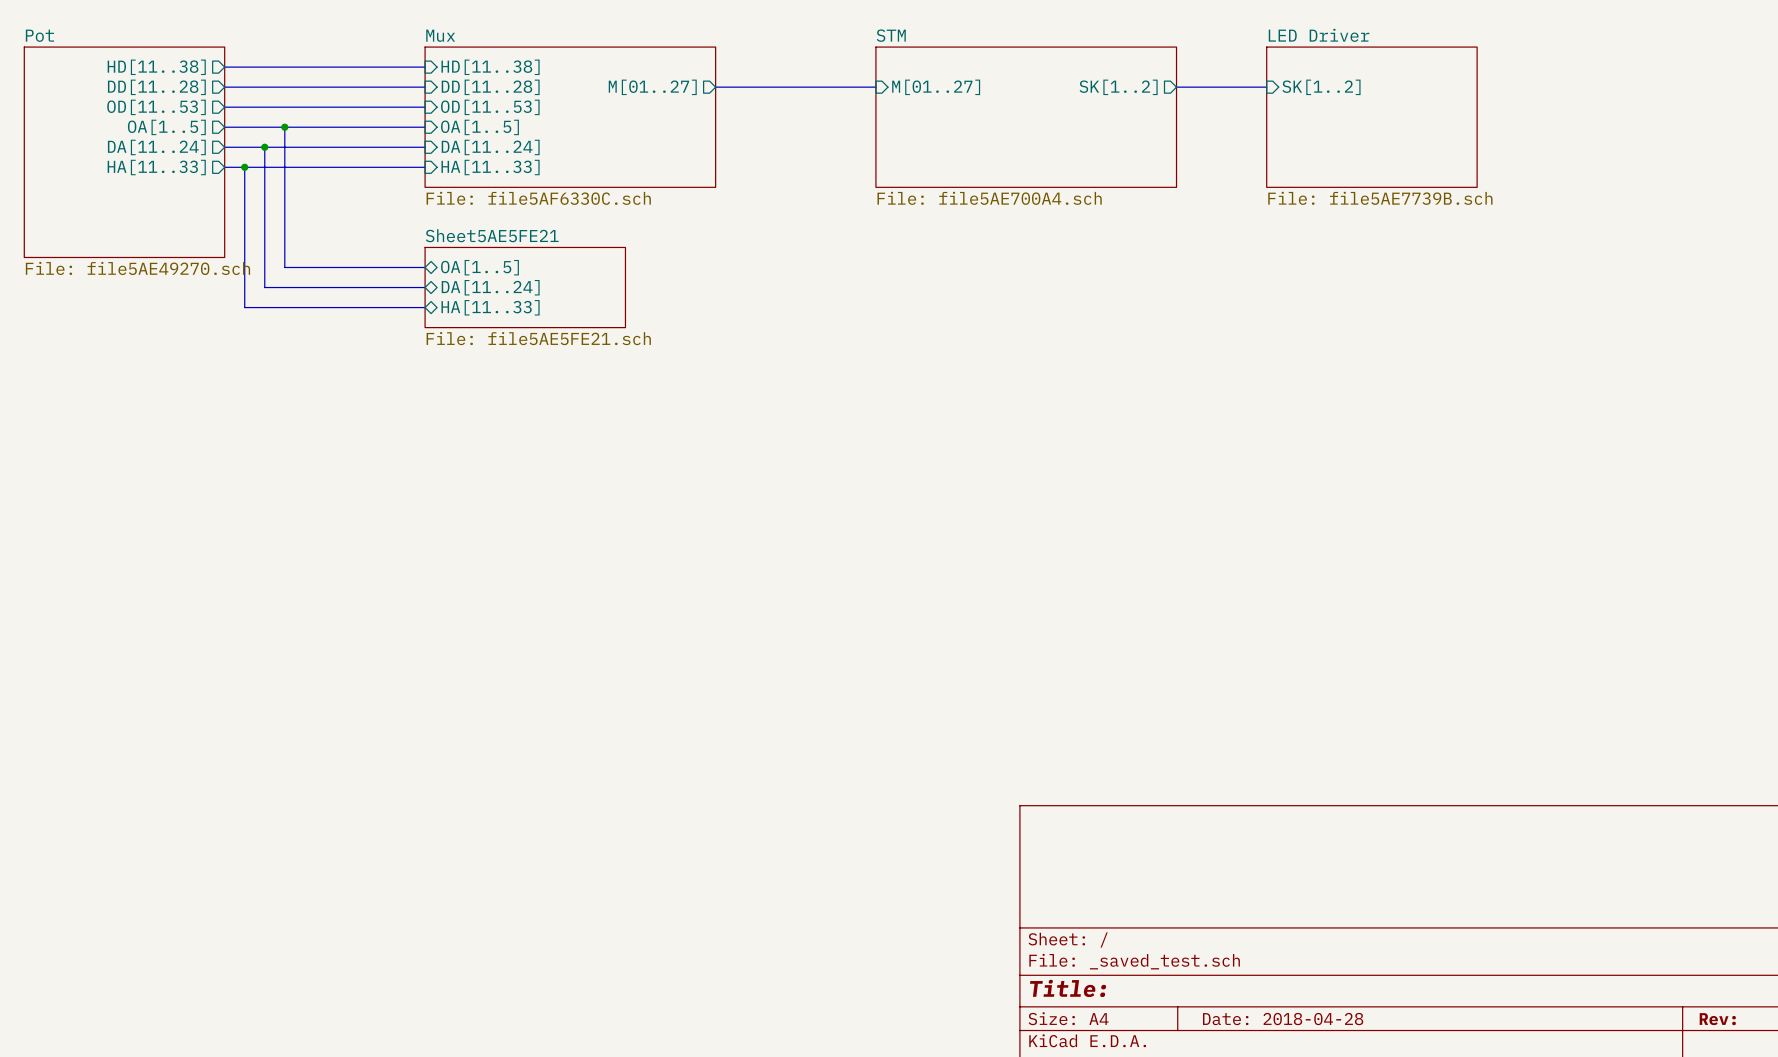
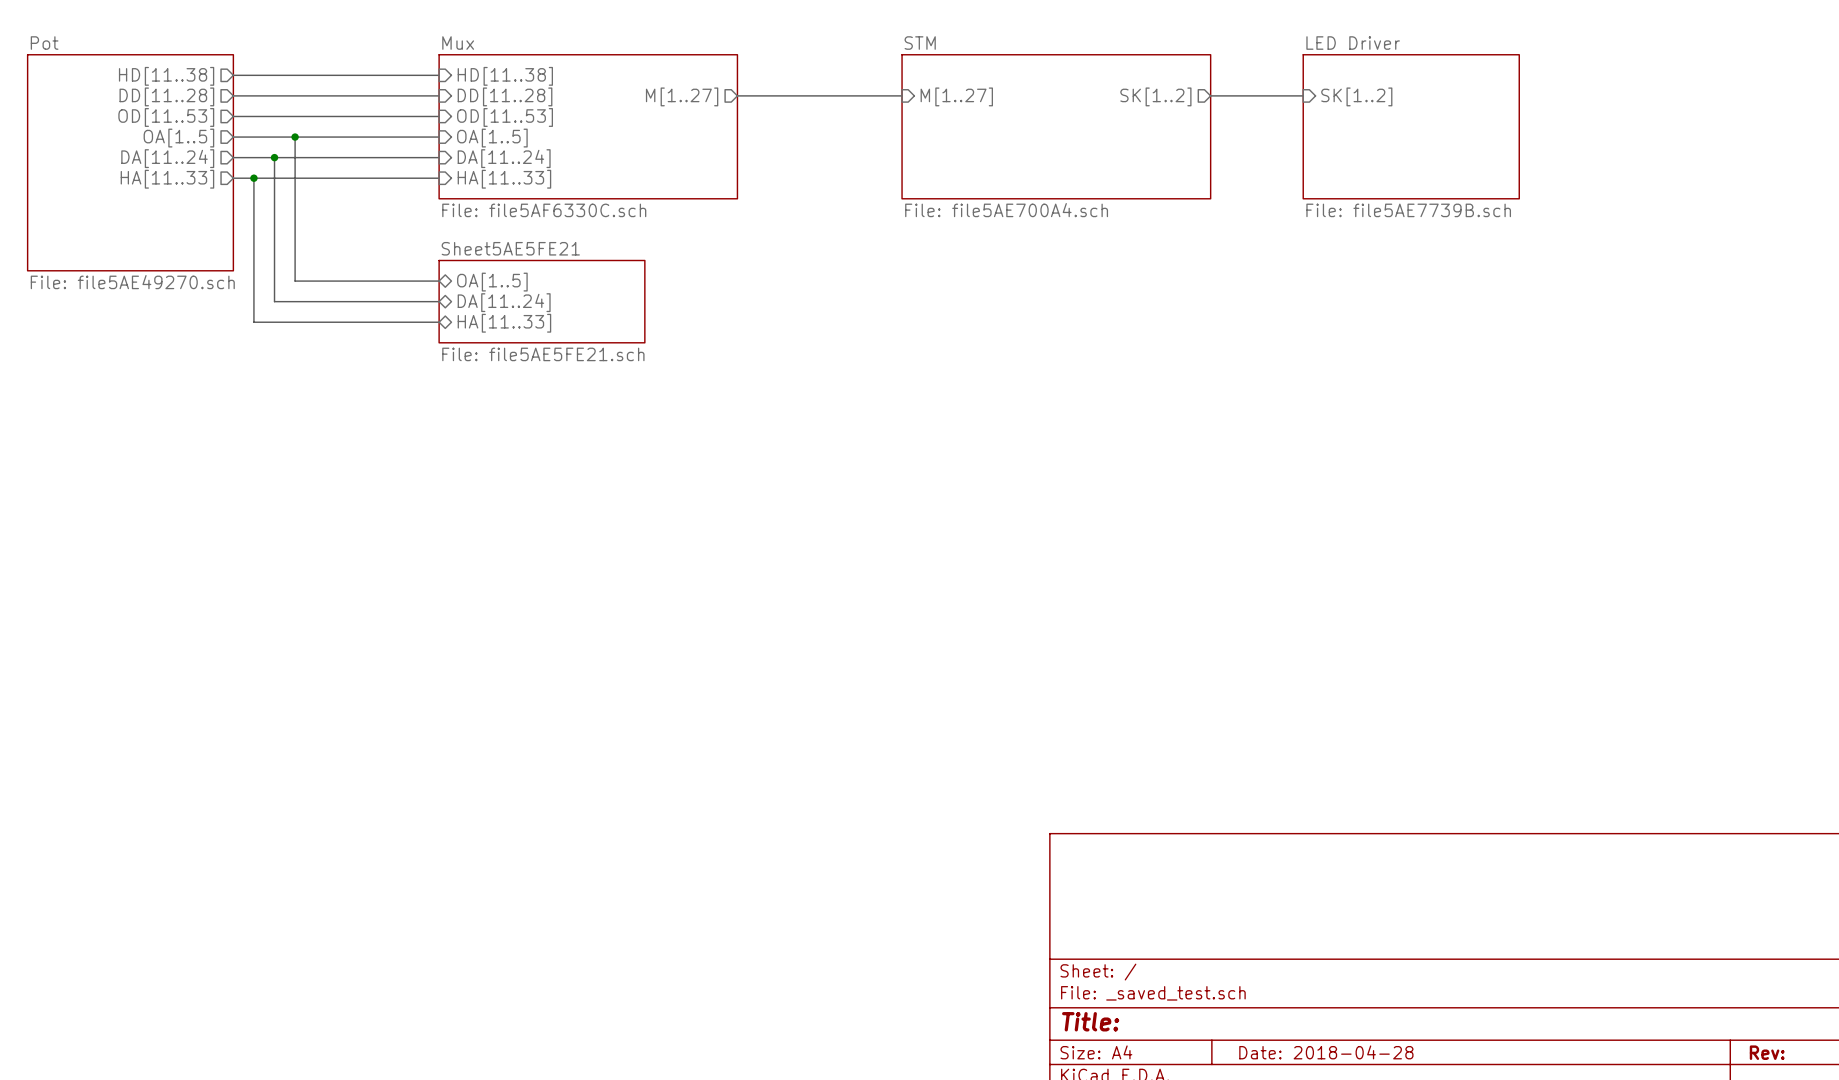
sheet pin: M[01..27] (652, 87) -> M[1..27] (682, 96)
sheet pin: M[01..27] (936, 87) -> M[1..27] (956, 96)

